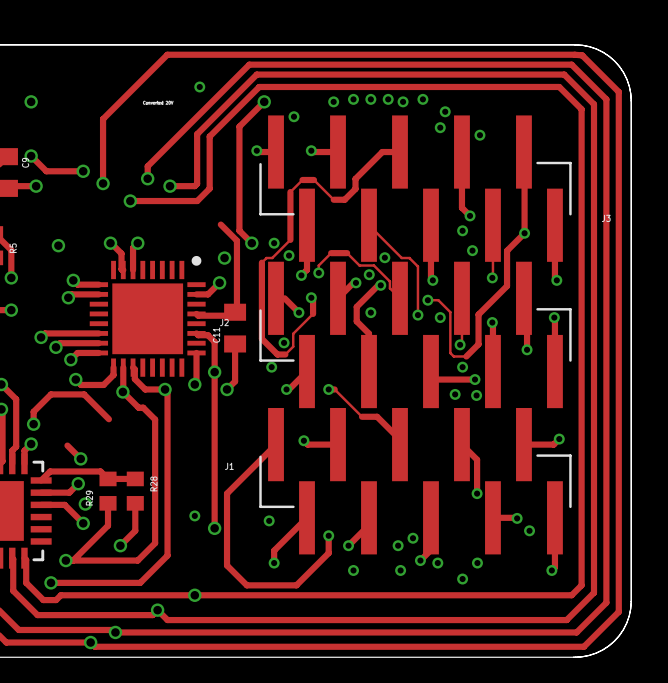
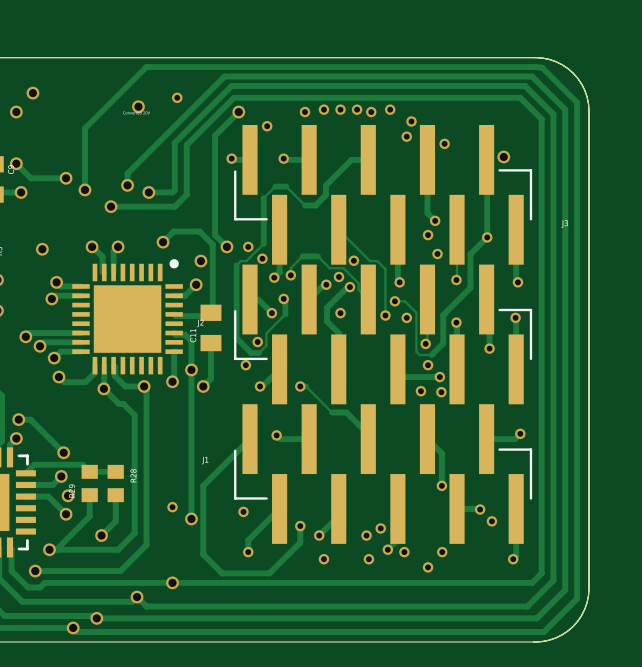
via: none -> (32, 93)
via: none -> (138, 106)
via: none -> (503, 156)
track: (220, 224) (223, 227) -> (163, 242) (173, 231) (199, 231)
via: none -> (163, 242)
track: (108, 419) (84, 394) (50, 394) (33, 411) (33, 424) -> (50, 440) (30, 419) (18, 419)

